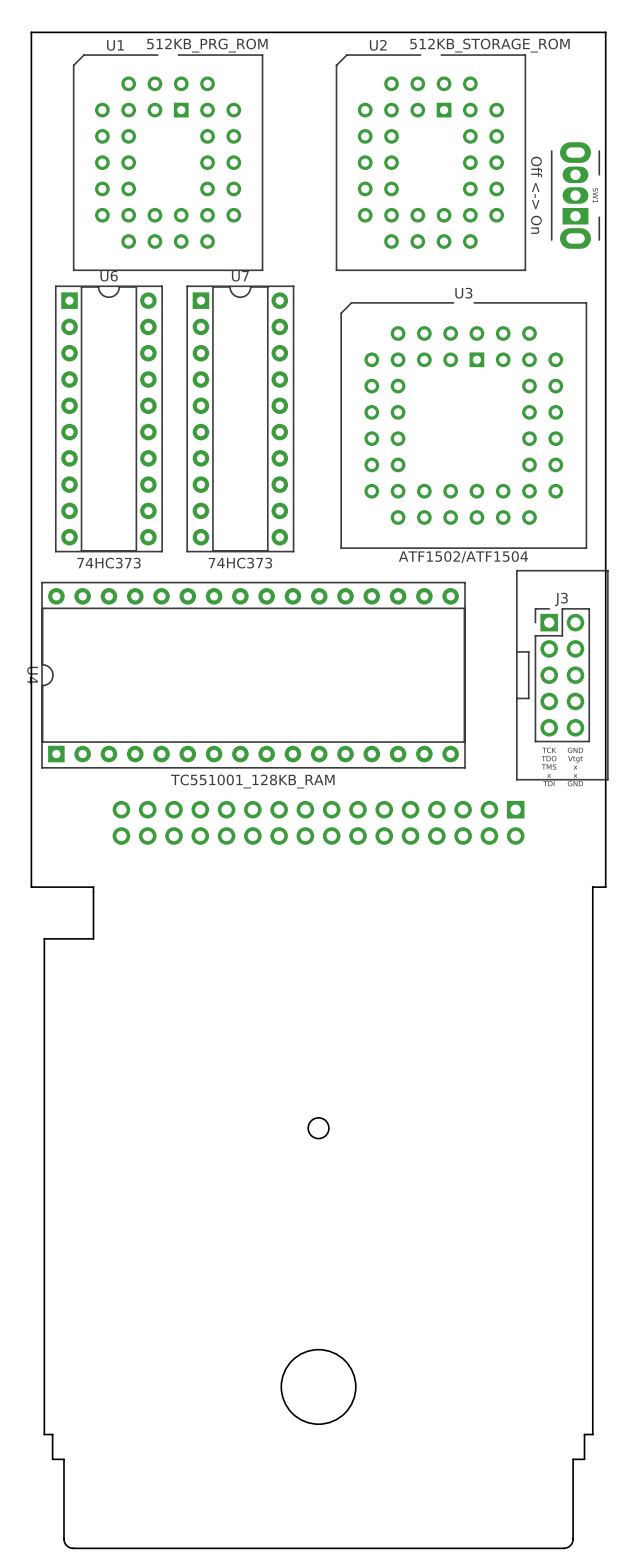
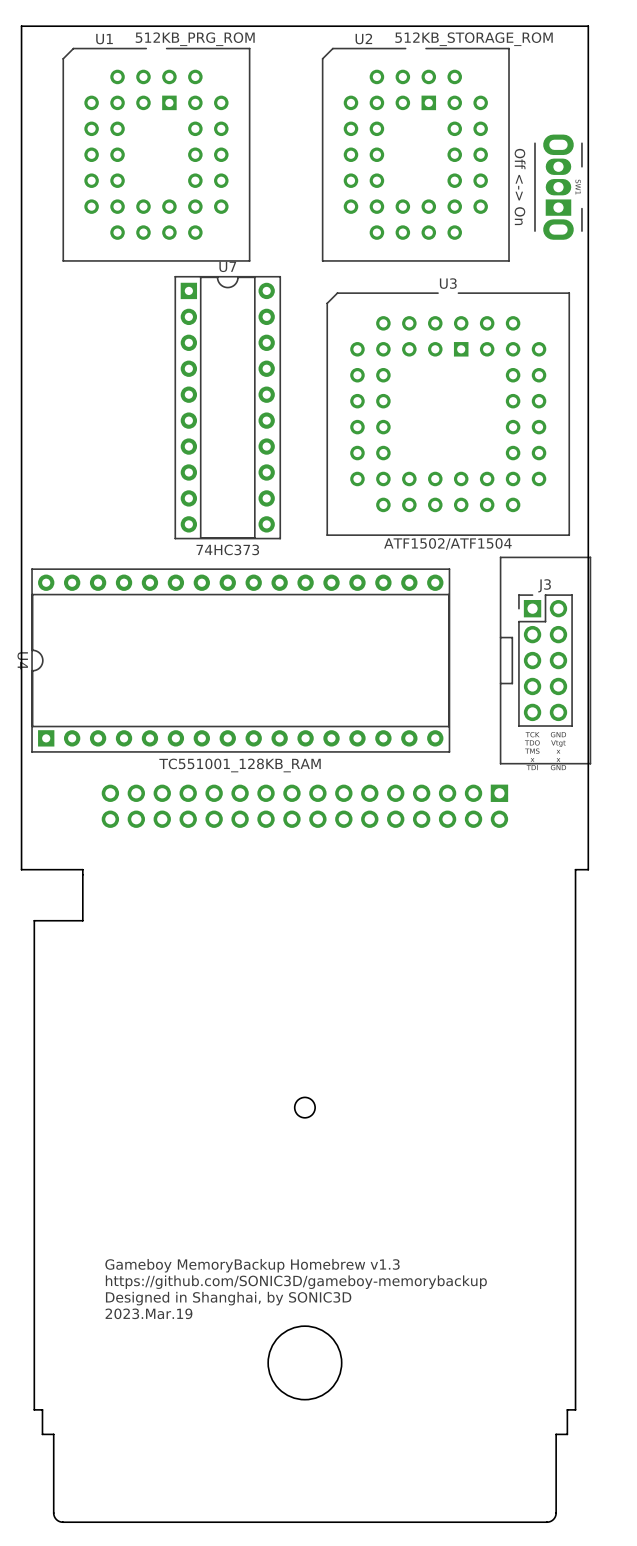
U6: (108, 418) -> none
text: 74HC373 (108, 563) -> none
text: none -> Gameboy MemoryBackup Homebrew v1.3 (252, 1265)
text: none -> https://github.com/SONIC3D/gameboy-memorybackup (296, 1282)
text: none -> Designed in Shanghai, by SONIC3D (228, 1298)
text: none -> 2023.Mar.19 (148, 1313)

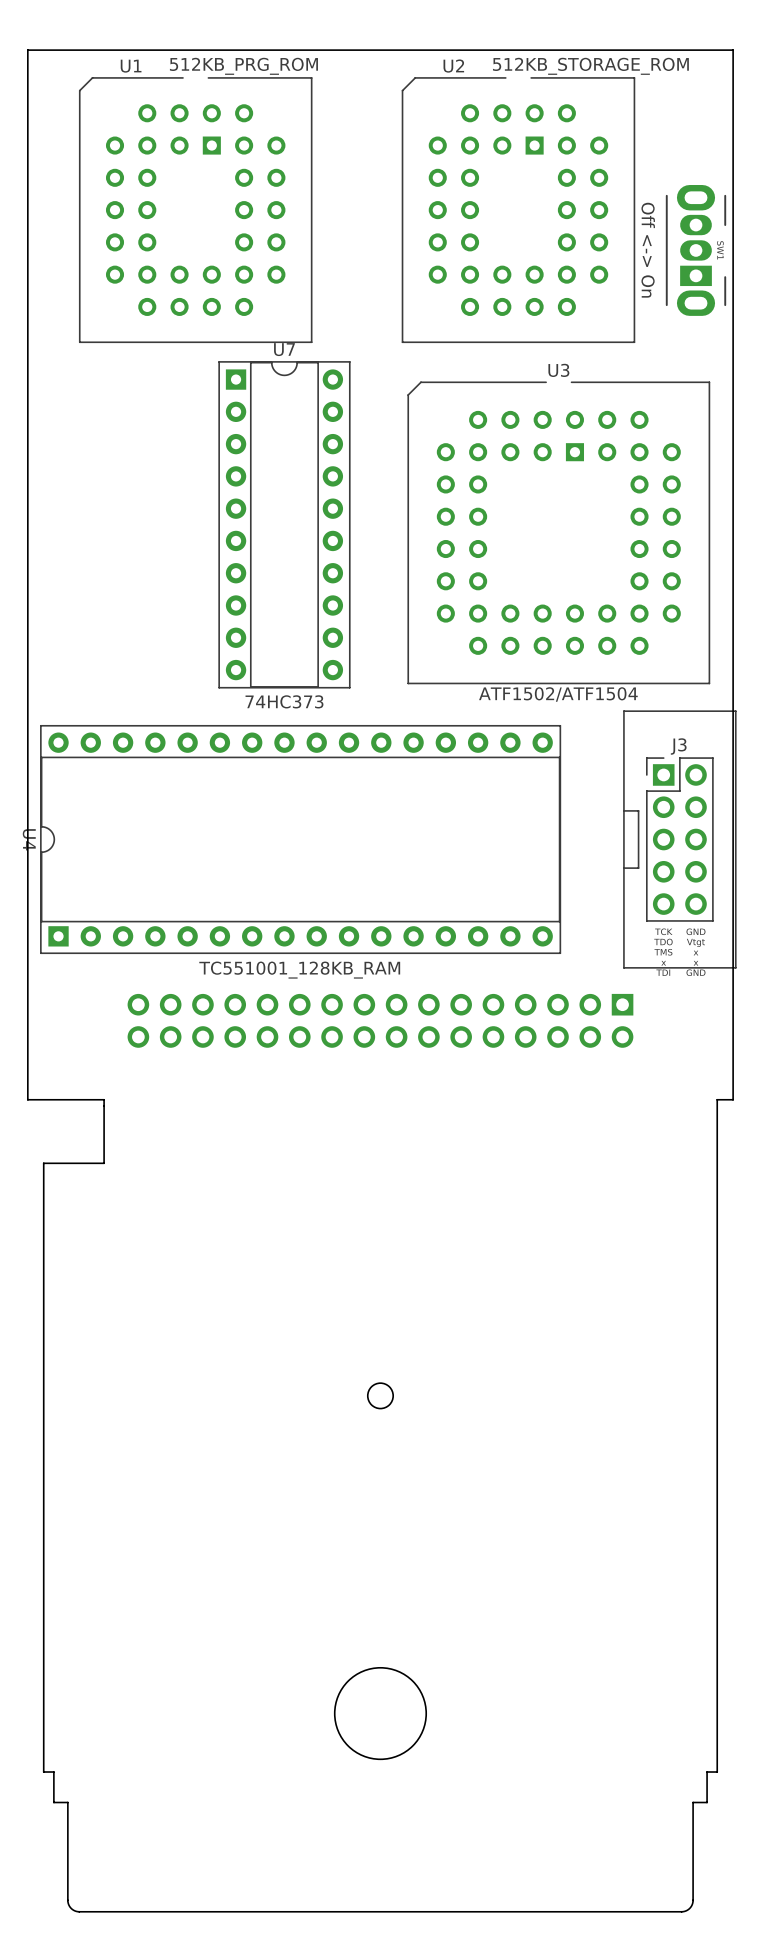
text: Gameboy MemoryBackup Homebrew v1.3 (252, 1265) -> none
text: https://github.com/SONIC3D/gameboy-memorybackup (296, 1282) -> none
text: Designed in Shanghai, by SONIC3D (228, 1298) -> none
text: 2023.Mar.19 (148, 1313) -> none

